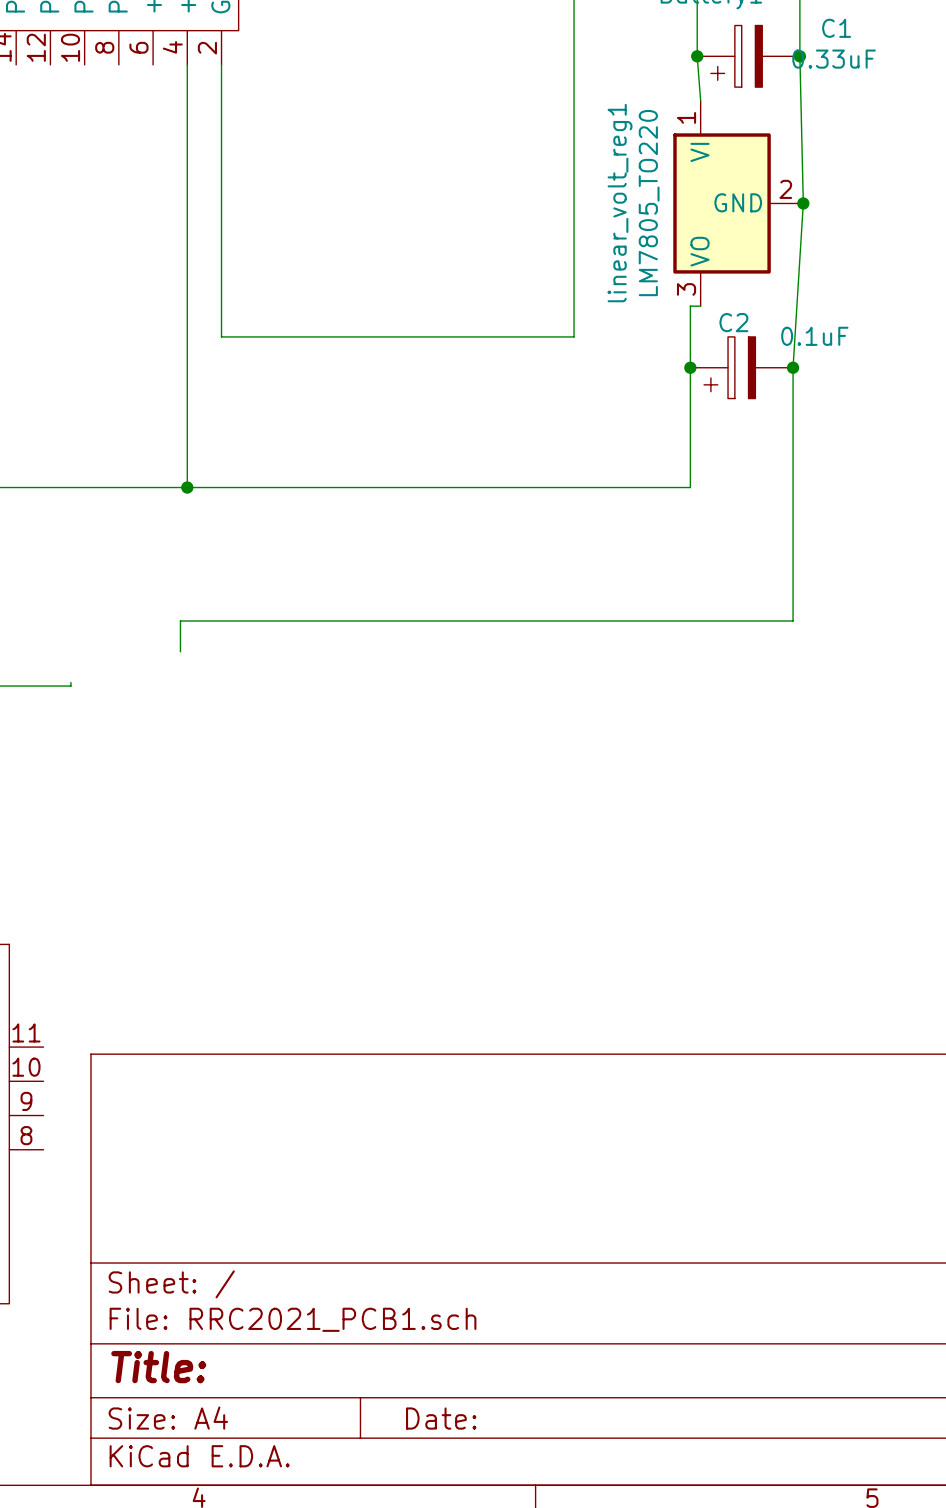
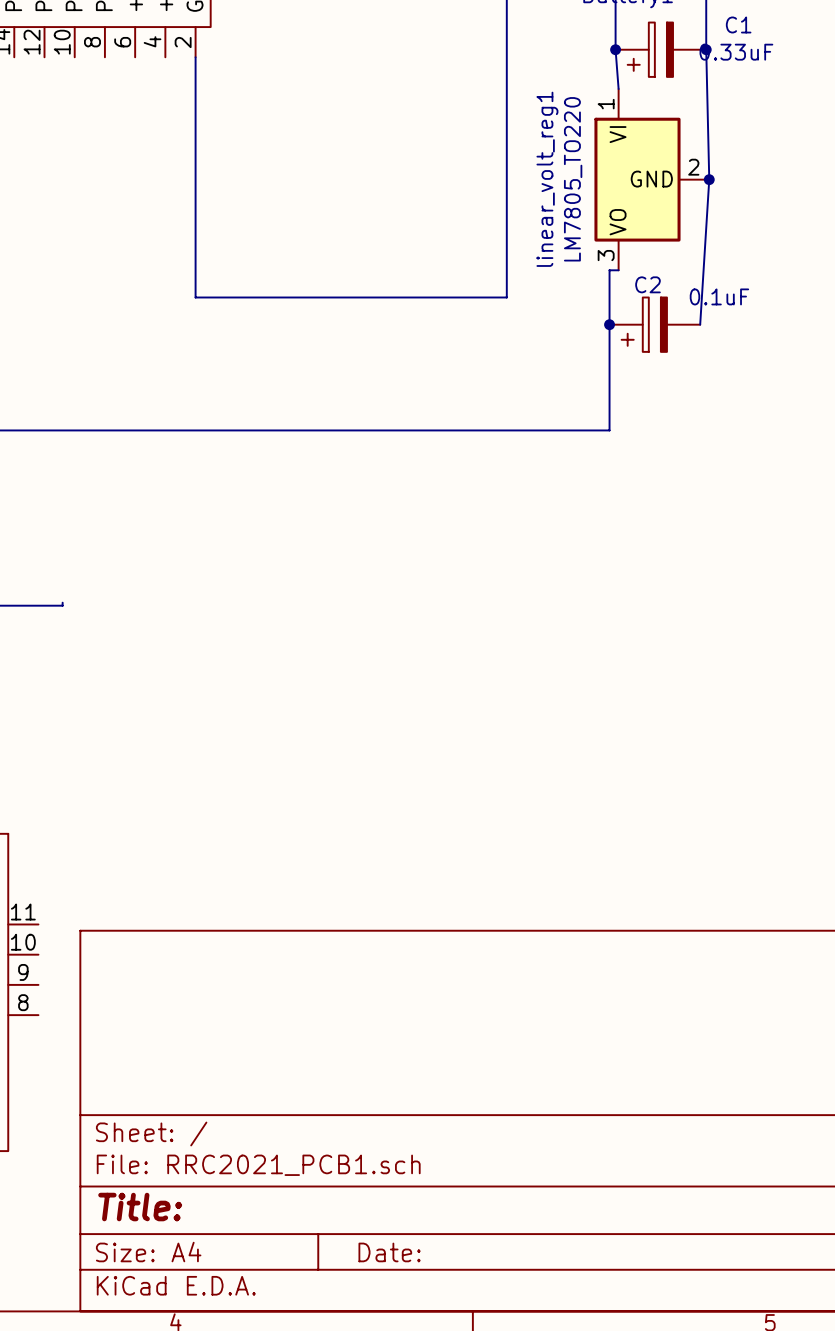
wire: (187, 64) (187, 487) -> none
wire: (793, 367) (793, 620) (180, 620) (180, 651) -> none
junction: (793, 367) -> none
junction: (187, 487) -> none

